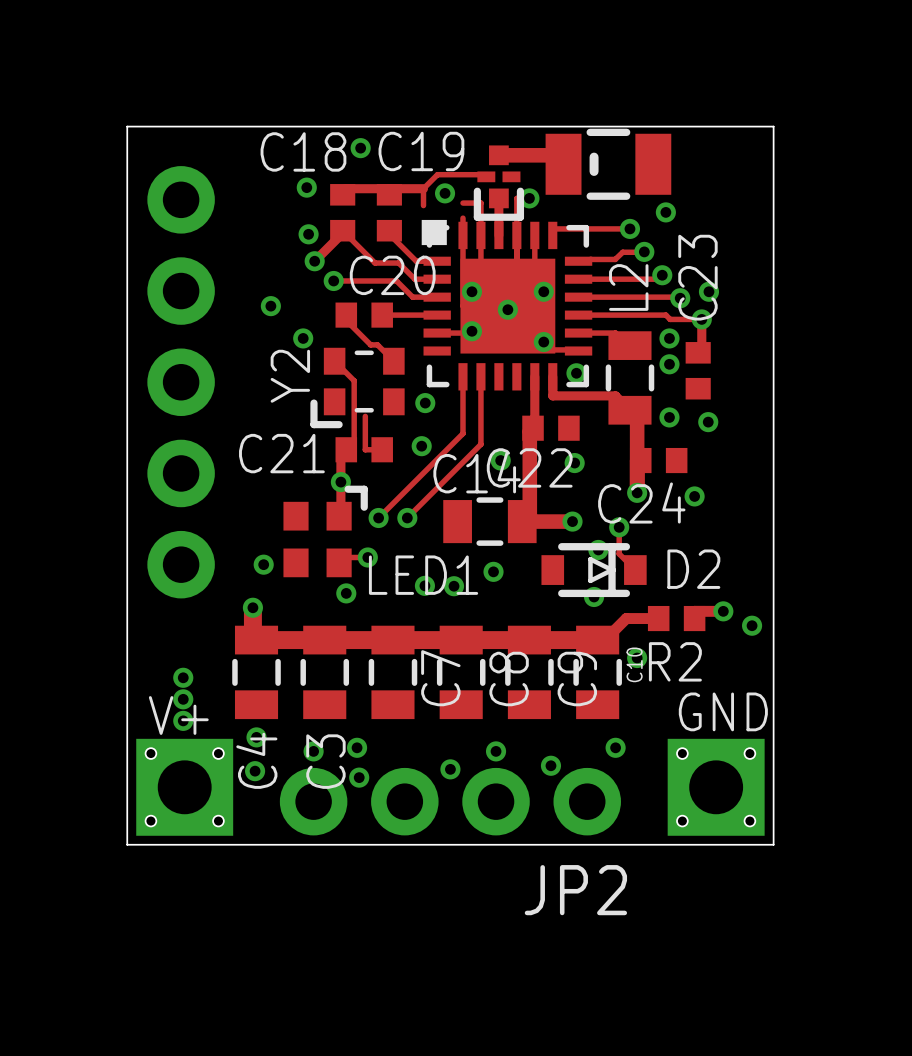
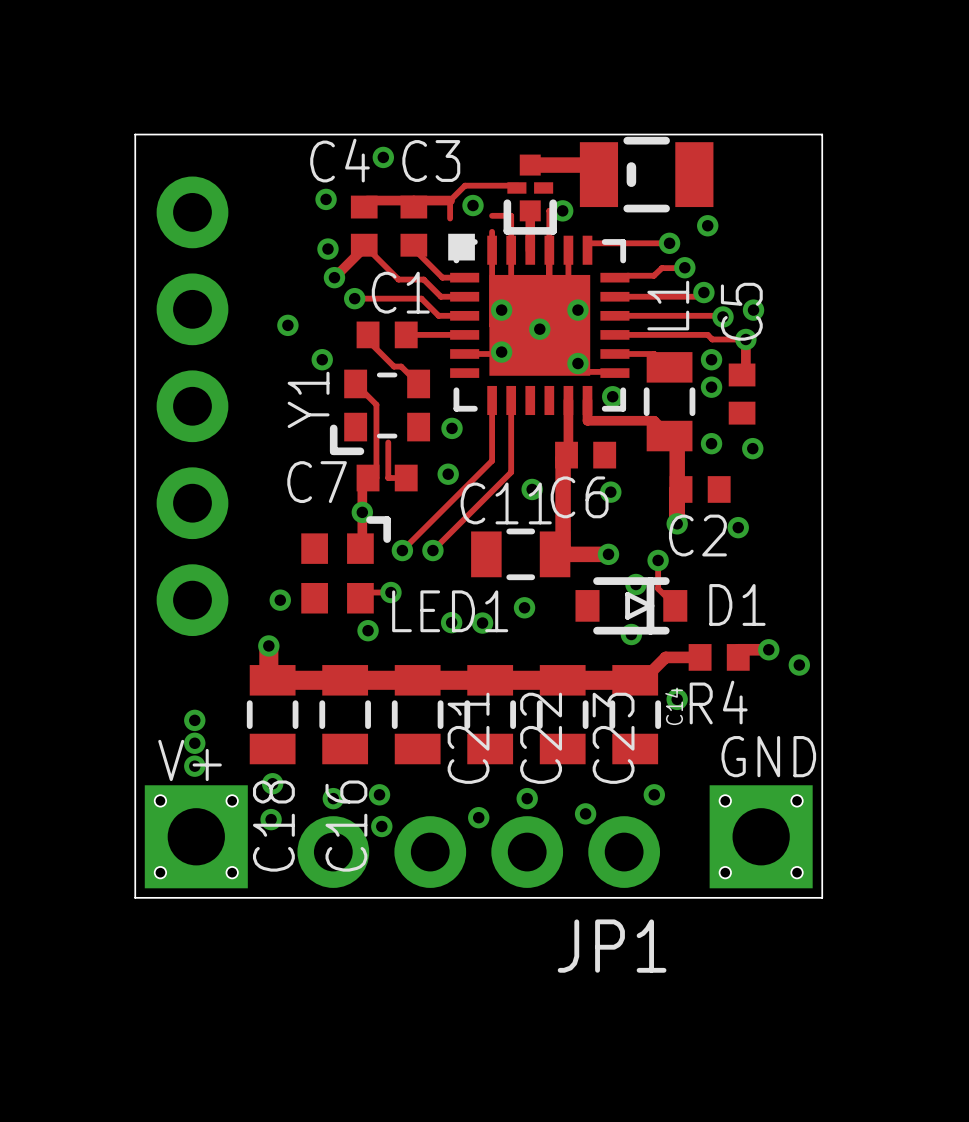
C18 name: C18 (303, 151) -> C4 (339, 160)
C19 name: C19 (421, 151) -> C3 (431, 161)
C20 name: C20 (392, 275) -> C1 (400, 292)
C23 name: C23 (697, 277) -> C5 (741, 311)
L2 name: L2 (628, 287) -> L1 (668, 305)
Y2 name: Y2 (290, 376) -> Y1 (308, 399)
C21 name: C21 (281, 453) -> C7 (317, 482)
C22 name: C22 (529, 467) -> C6 (579, 497)
C14 name: C14 (477, 472) -> C11 (506, 503)
C24 name: C24 (641, 502) -> C2 (697, 535)
D2 name: D2 (693, 569) -> D1 (737, 604)
R2 name: R2 (675, 661) -> R4 (718, 702)
C10 name: C10 (634, 664) -> C14 (674, 706)
C7 name: C7 (440, 678) -> C21 (468, 738)
C8 name: C8 (509, 679) -> C22 (541, 738)
C9 name: C9 (577, 679) -> C23 (613, 738)
C4 name: C4 (256, 760) -> C18 (273, 826)
C3 name: C3 (325, 761) -> C16 (346, 826)
JP2 name: JP2 (575, 890) -> JP1 (612, 946)

